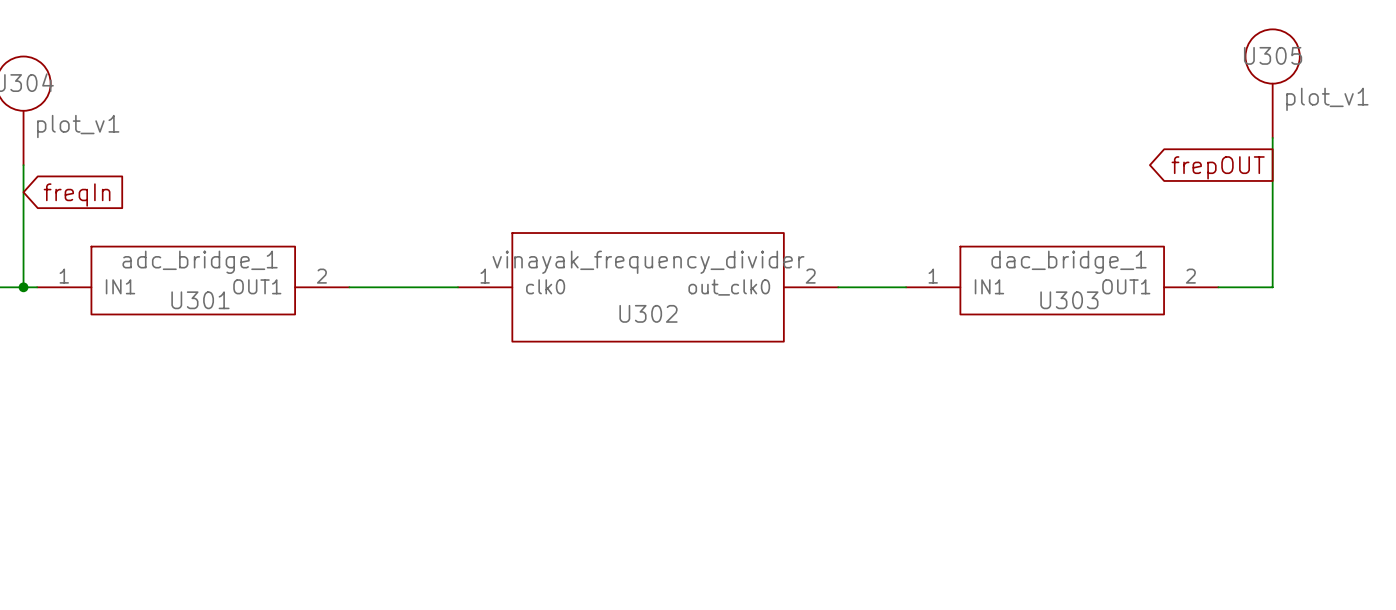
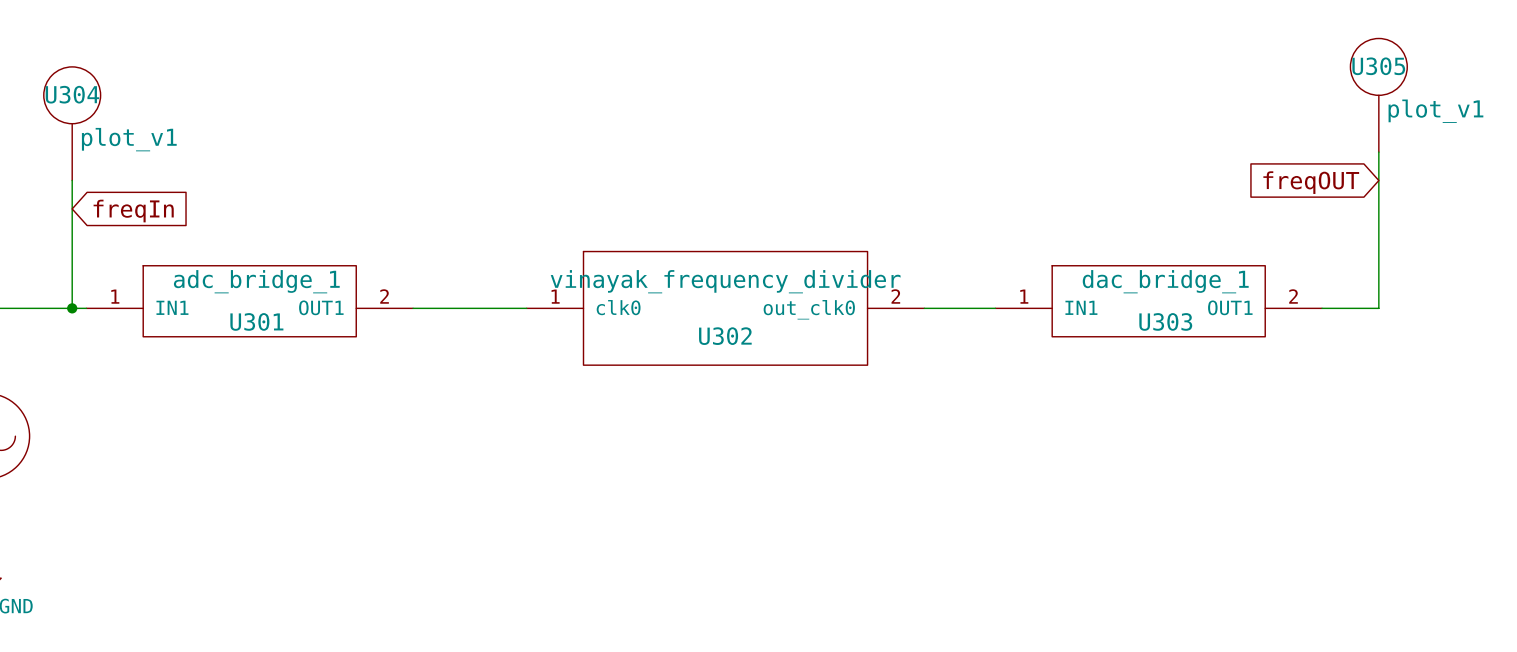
global label shape: output (1218, 167) -> input (1311, 182)
global label: frepOUT (1218, 167) -> freqOUT (1311, 182)

